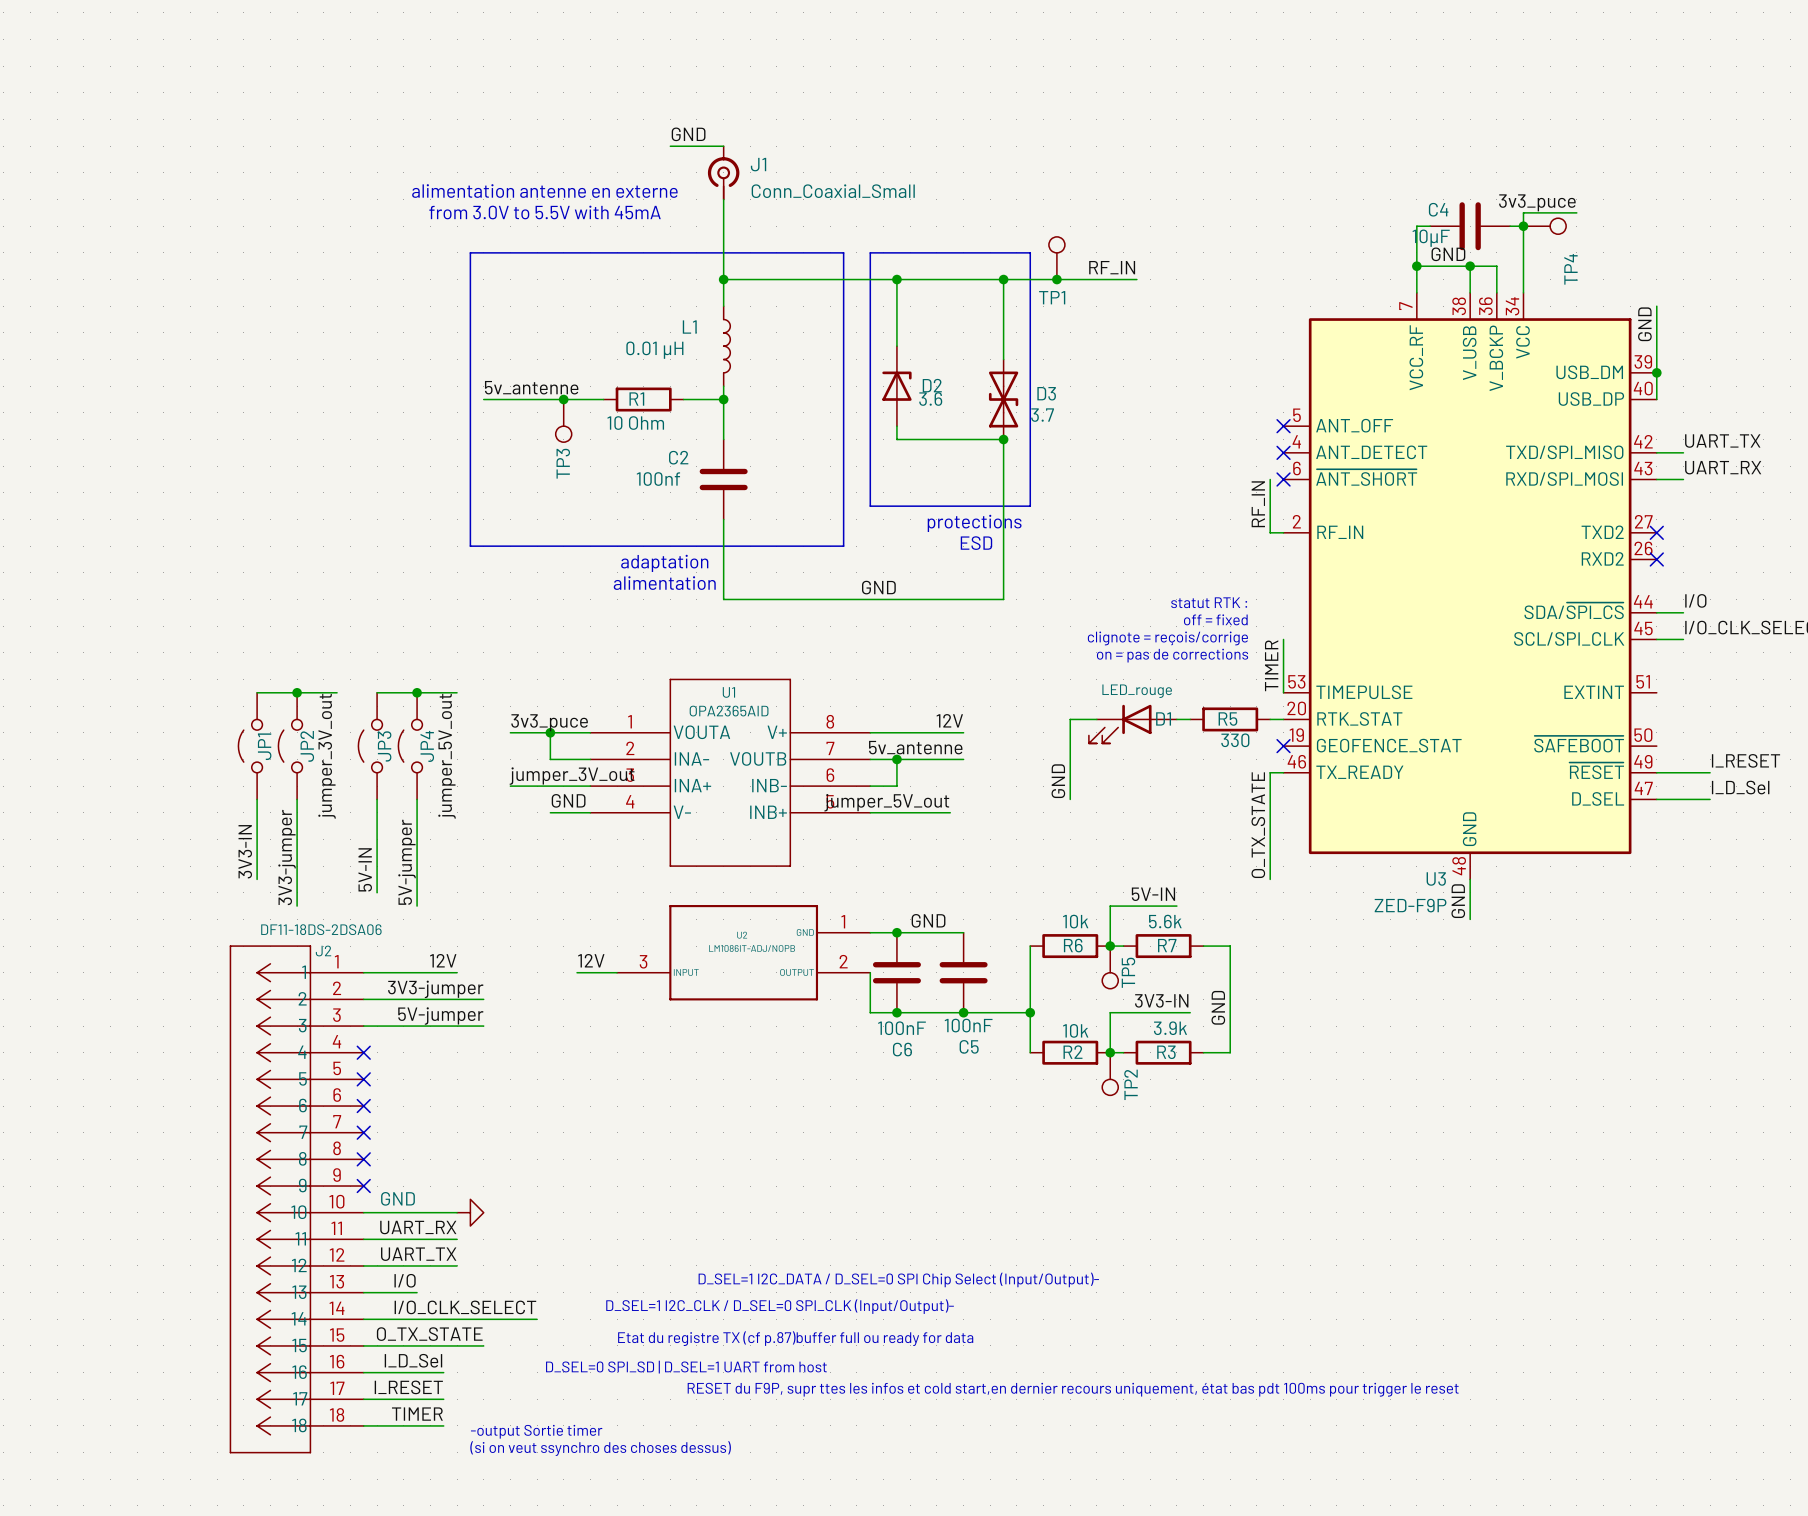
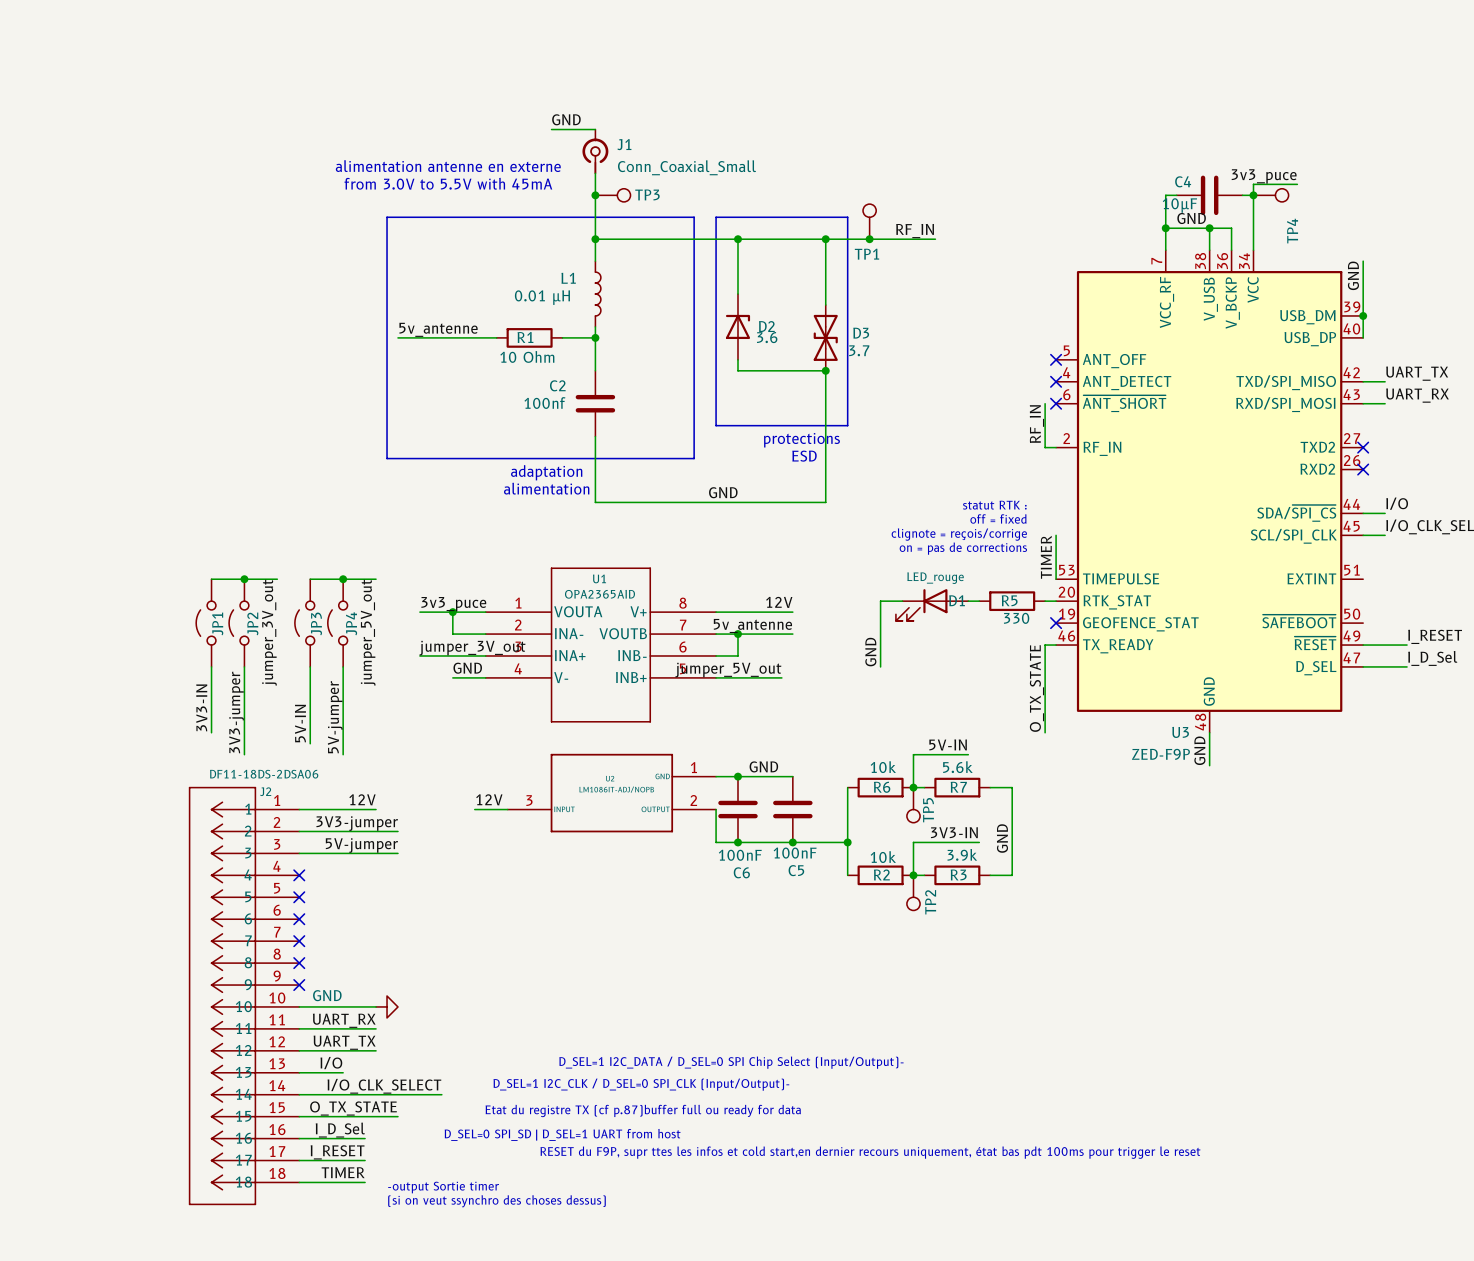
junction: none -> (595, 195)
junction: (563, 399) -> none
TP3 position: (563, 420) -> (612, 195)
TP3 rotation: 0° (563, 434) -> 90° counterclockwise (623, 195)

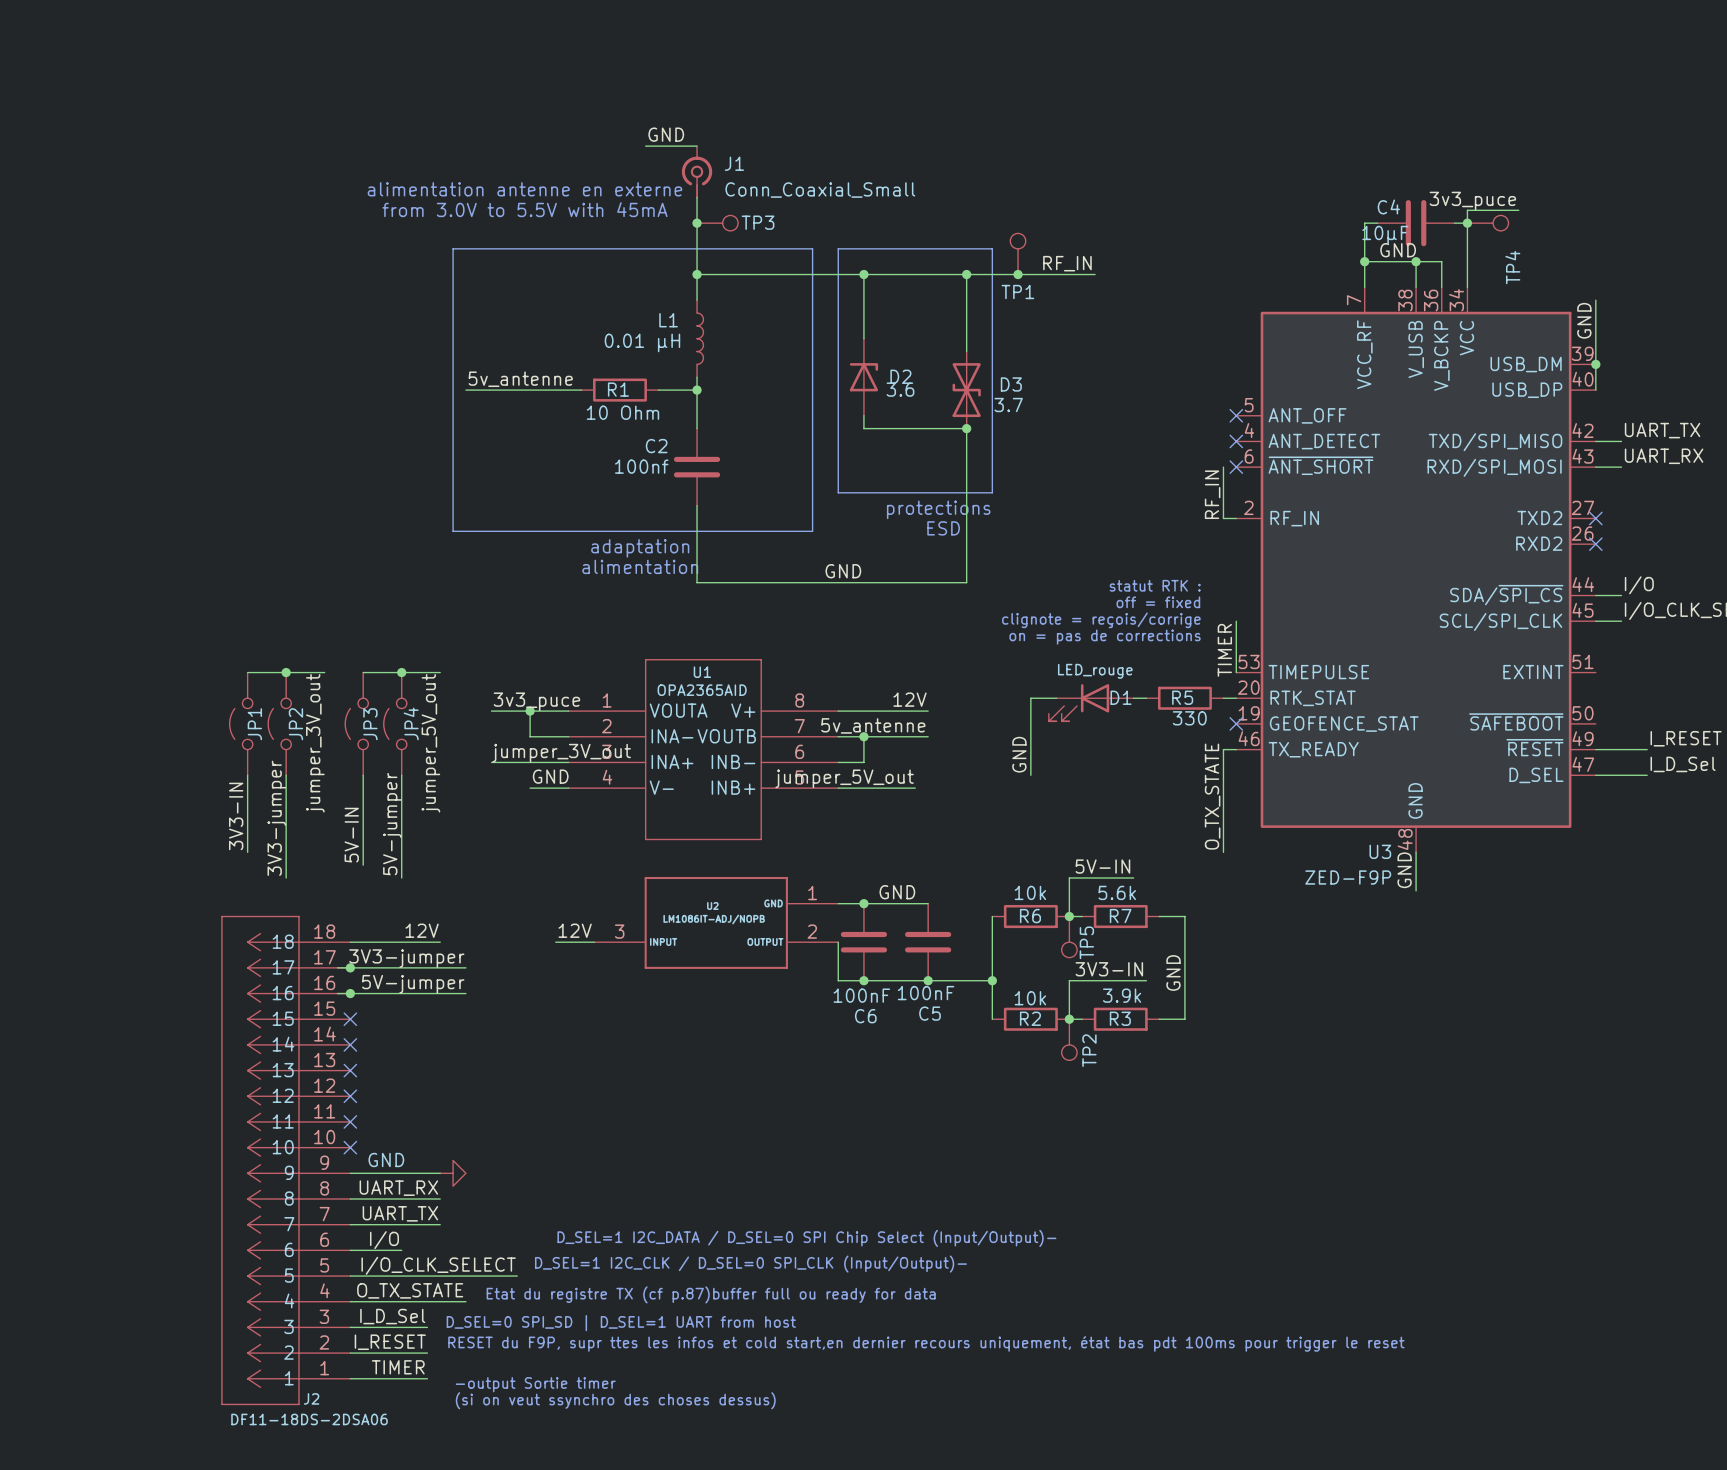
junction: none -> (350, 967)
junction: none -> (350, 993)
J2 flip: as is (222, 996) -> up-down (260, 1160)

